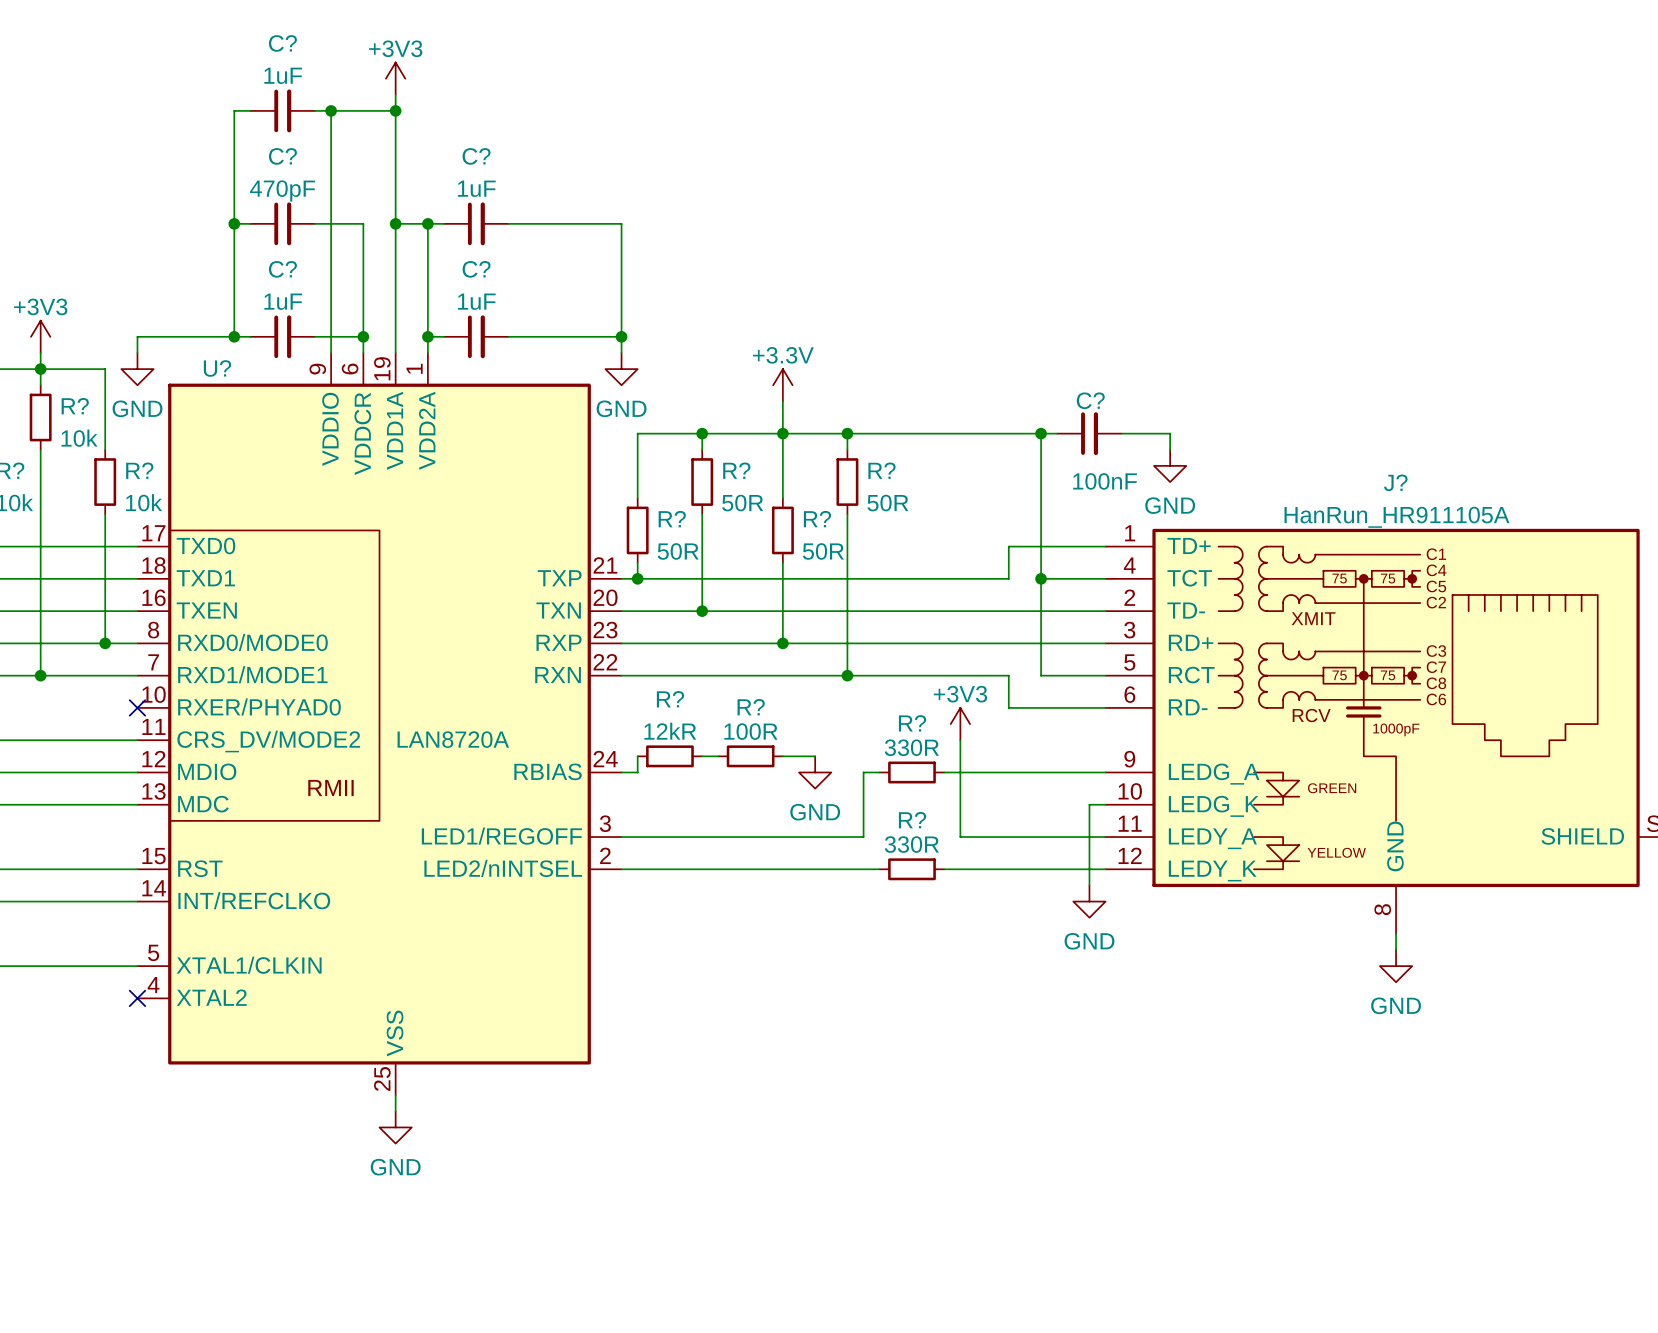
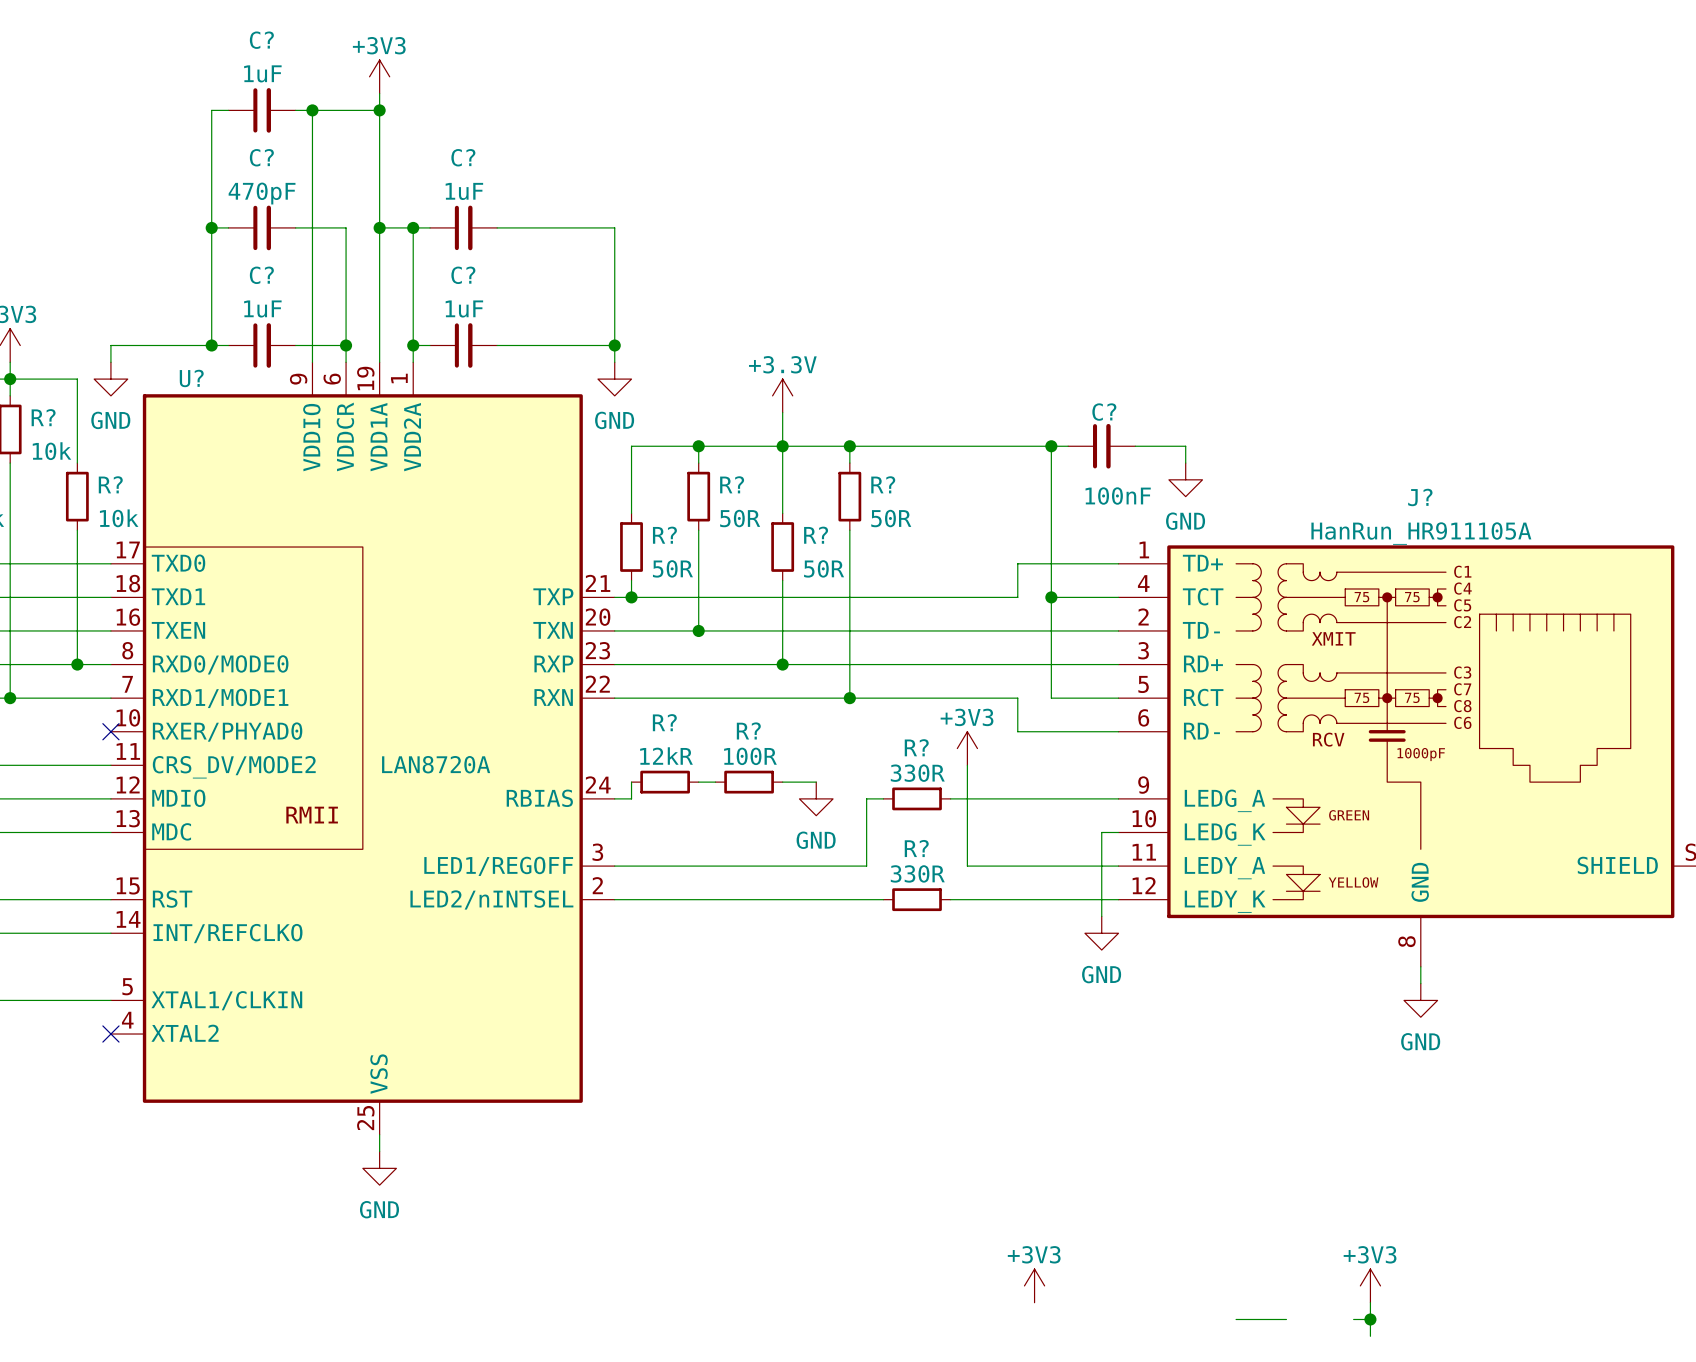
power symbol: none -> +3V3 (1034, 1285)
power symbol: none -> +3V3 (1370, 1285)
wire: none -> (1370, 1302) (1370, 1336)
wire: none -> (1236, 1319) (1286, 1319)
wire: none -> (1353, 1319) (1370, 1319)
junction: none -> (1370, 1319)

